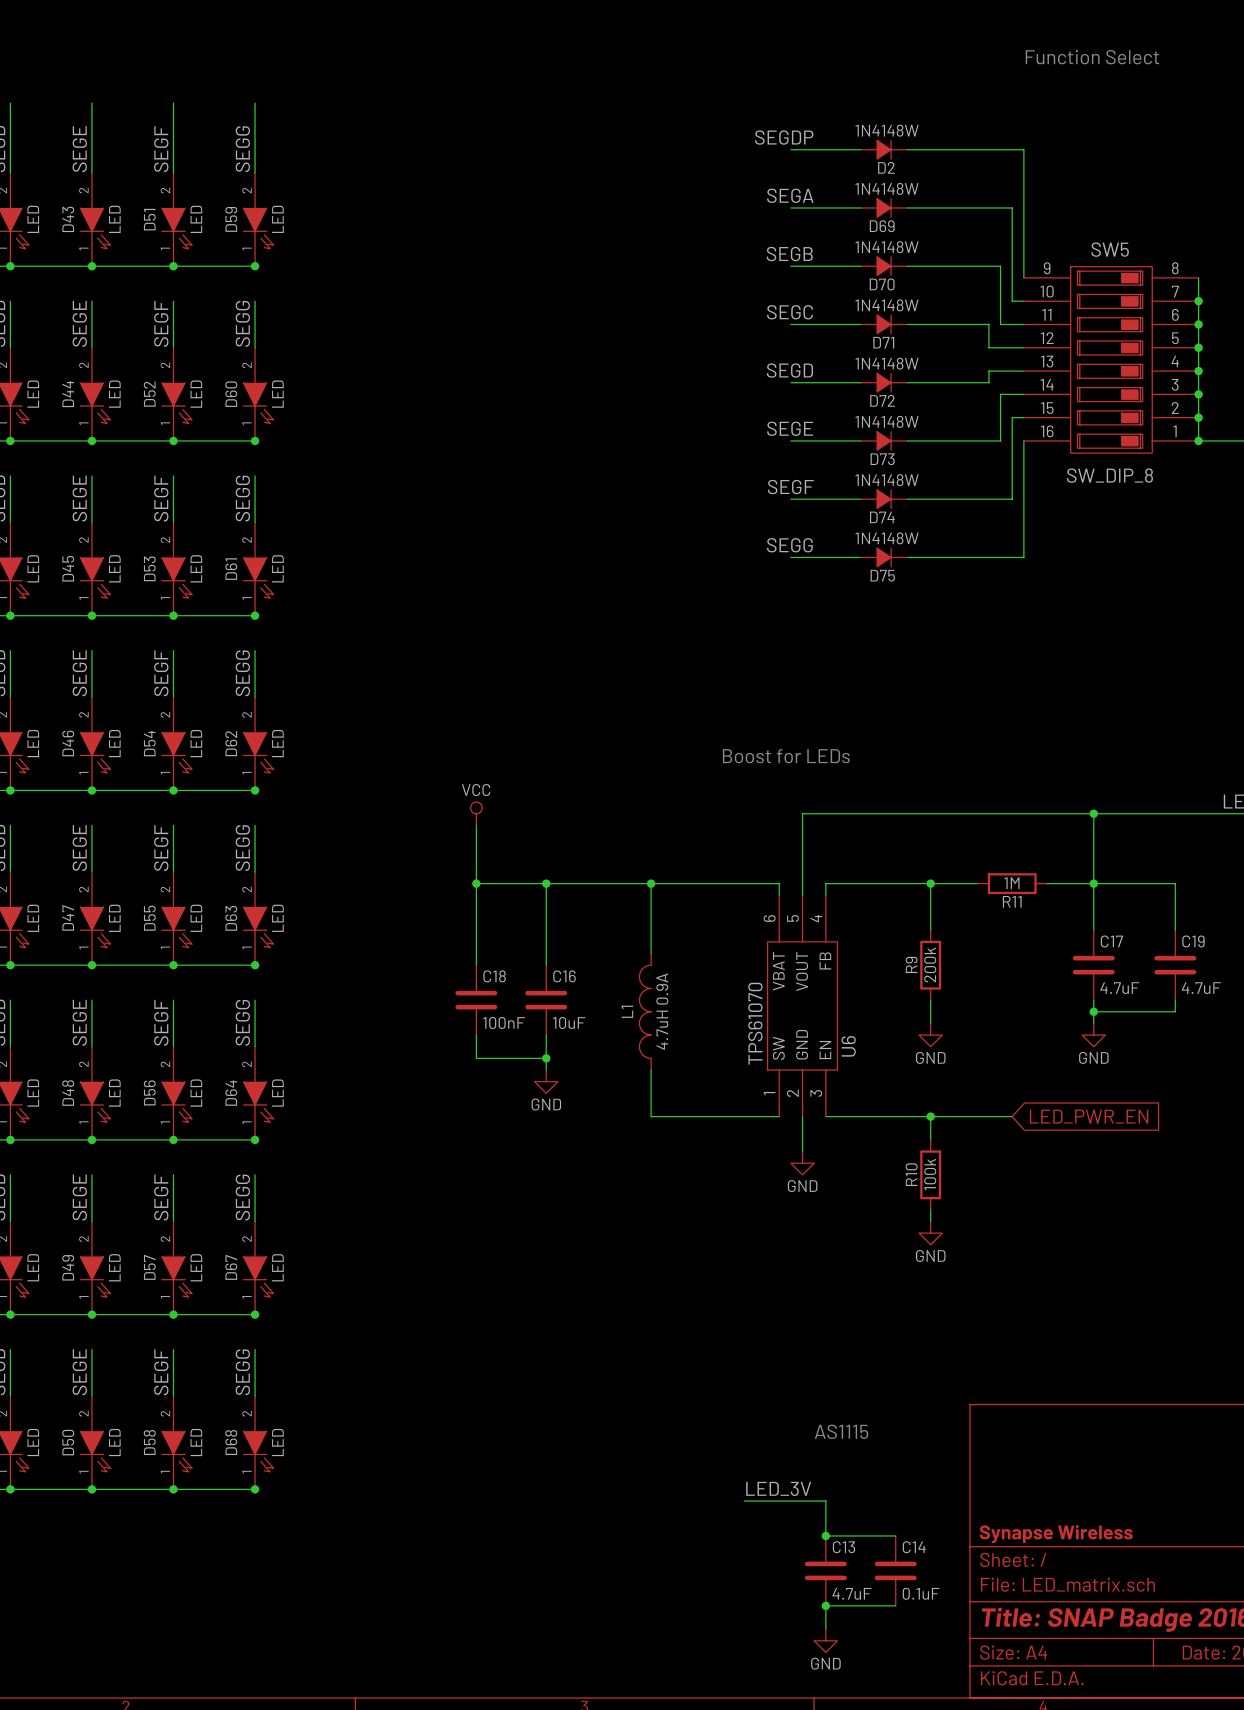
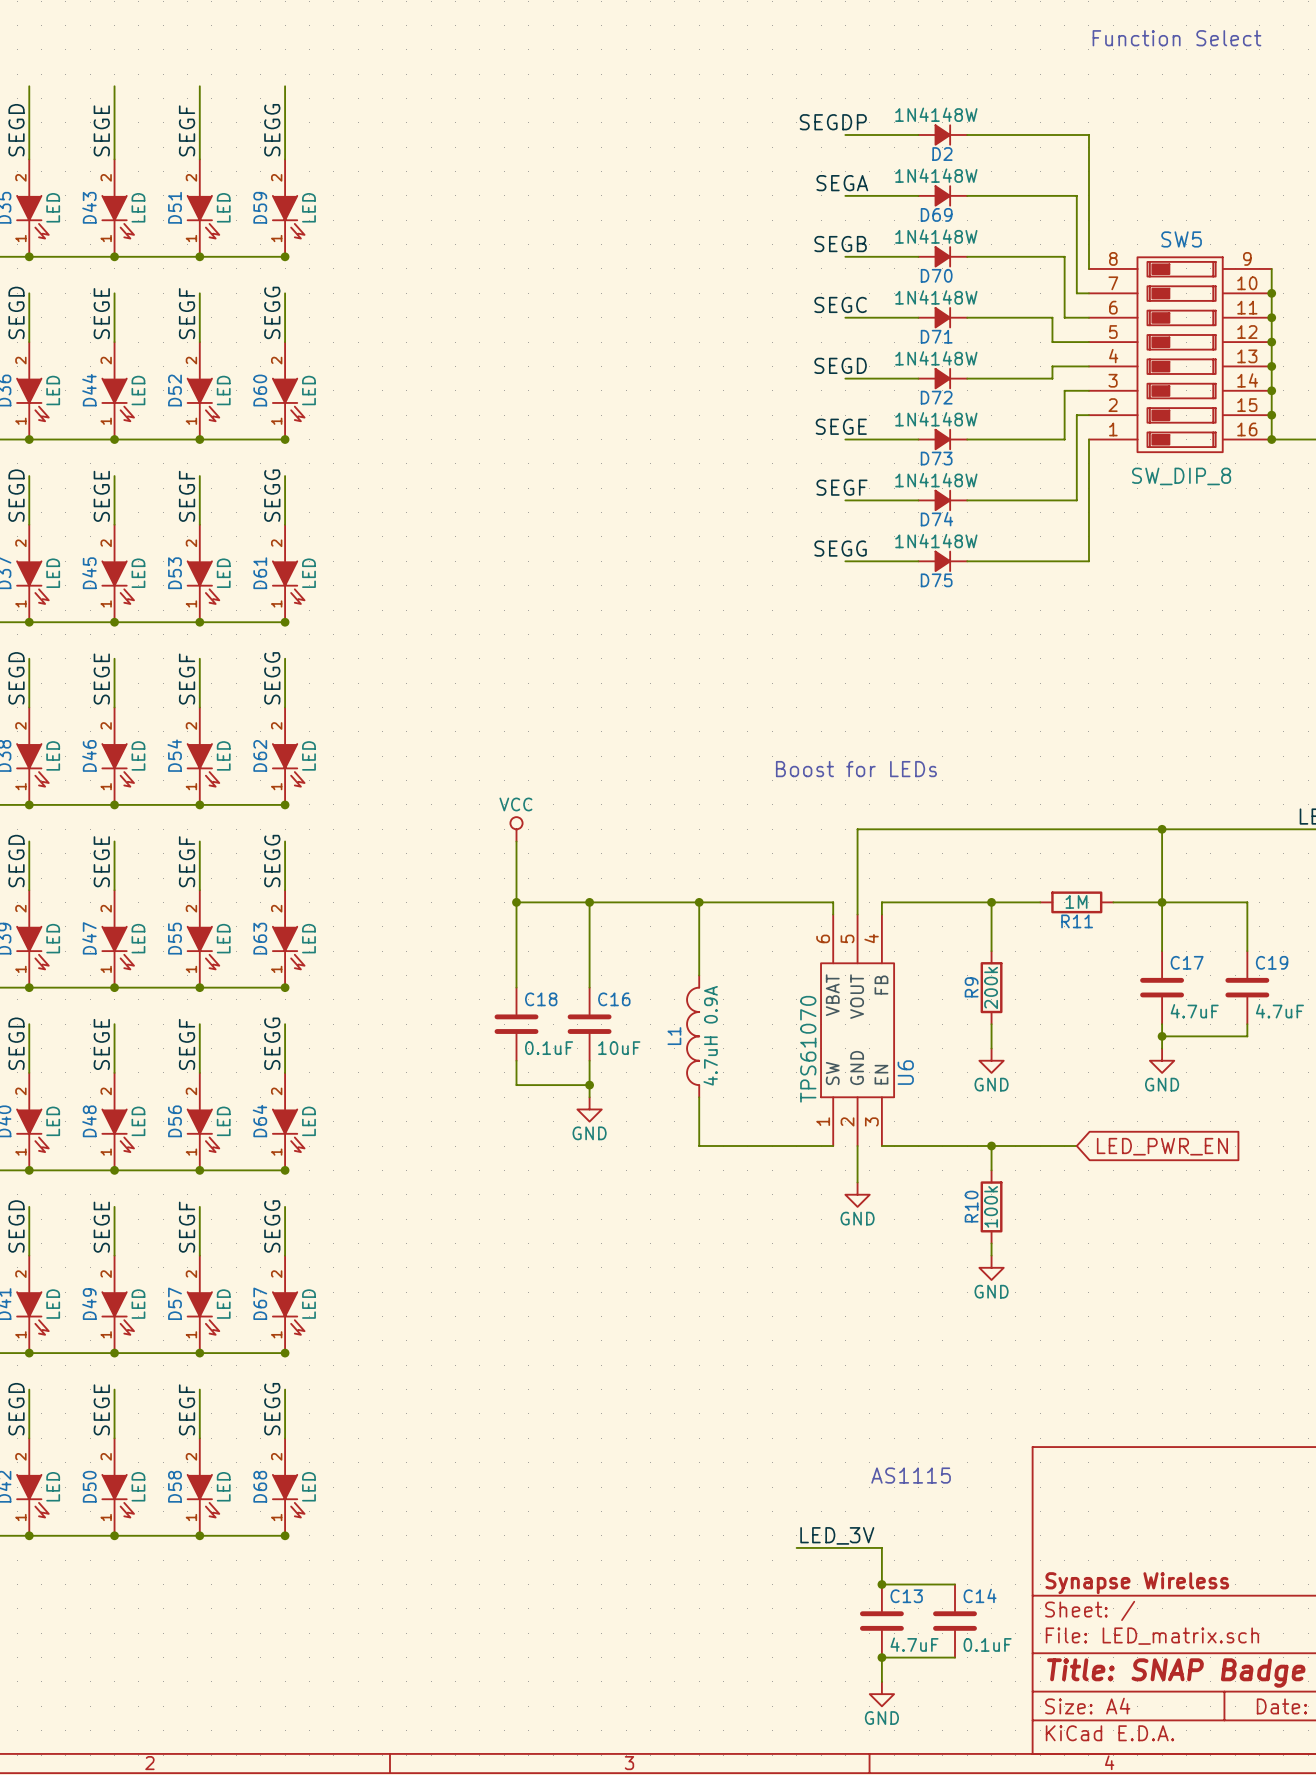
SW5 flip: as is (1111, 359) -> left-right (1180, 354)
C18 value: 100nF (504, 1022) -> 0.1uF (549, 1048)

